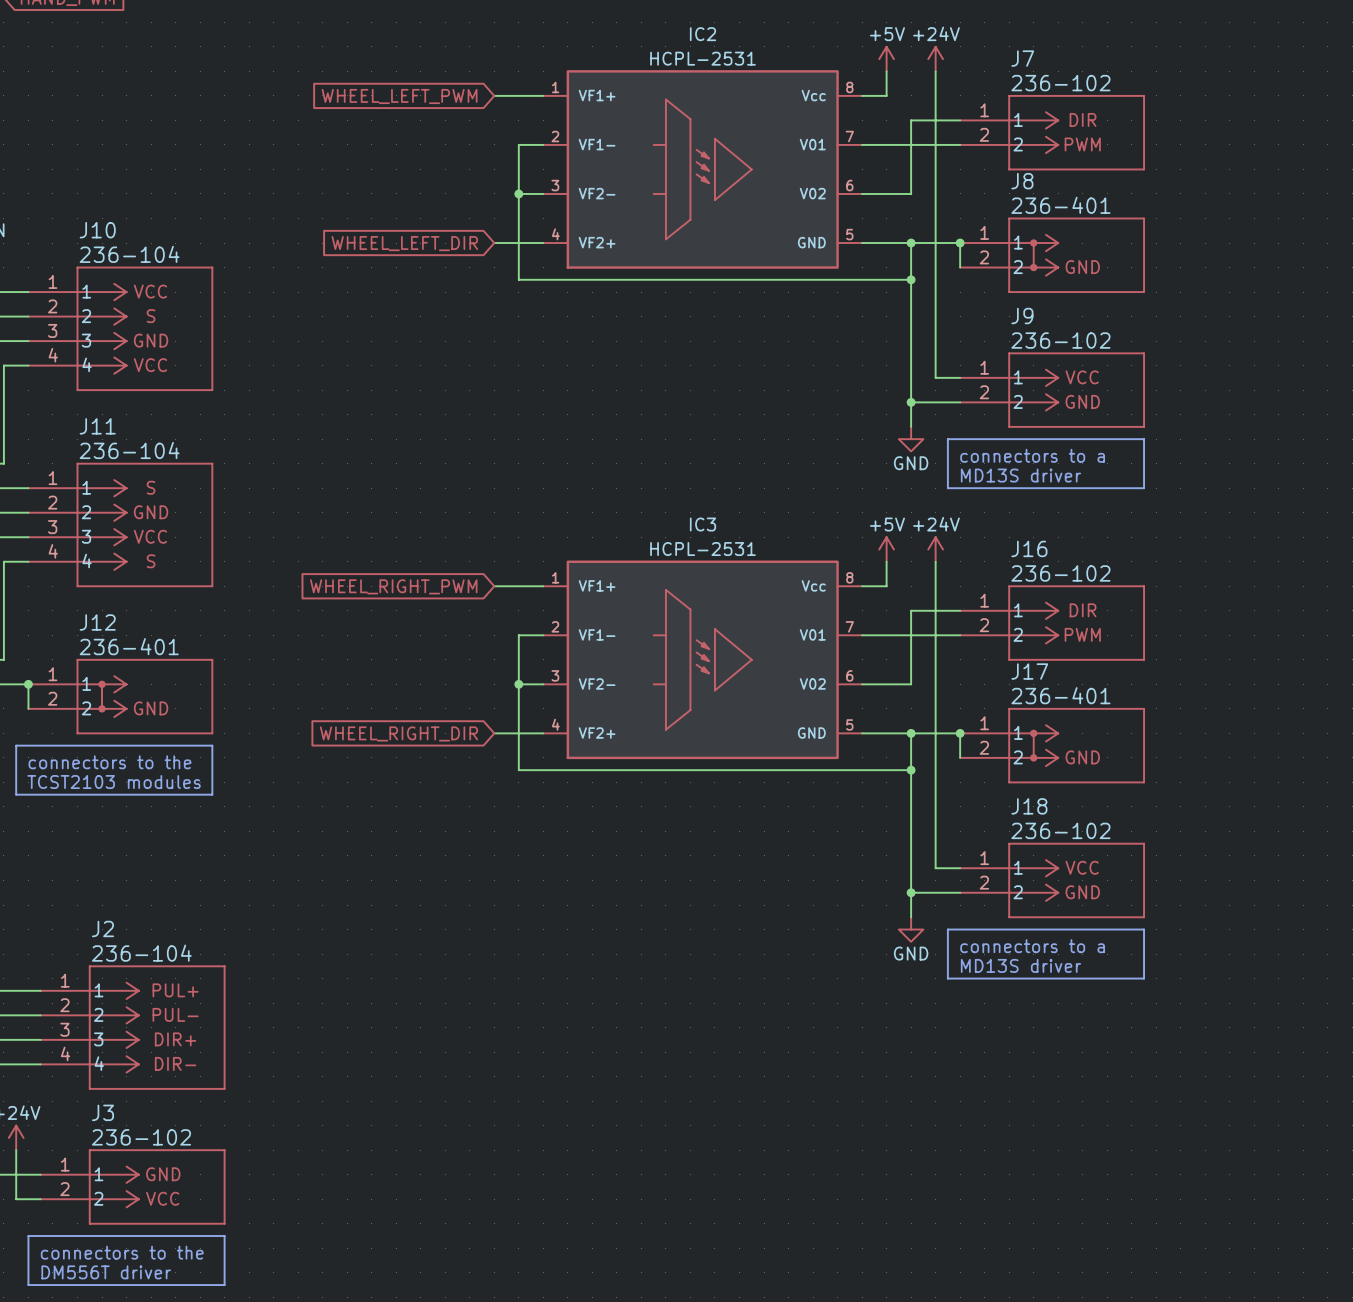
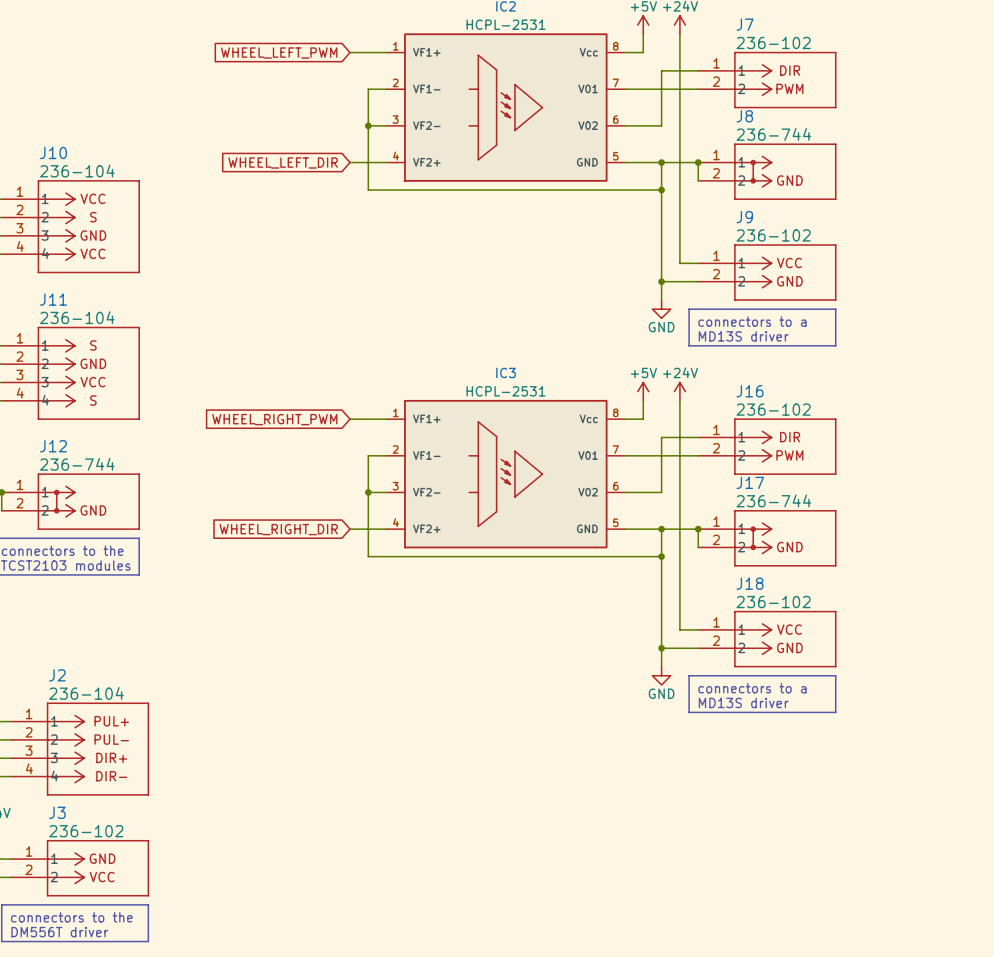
J8 value: 236-401 (1060, 205) -> 236-744 (773, 134)
J12 value: 236-401 (129, 646) -> 236-744 (77, 464)
J17 value: 236-401 (1060, 695) -> 236-744 (773, 500)

